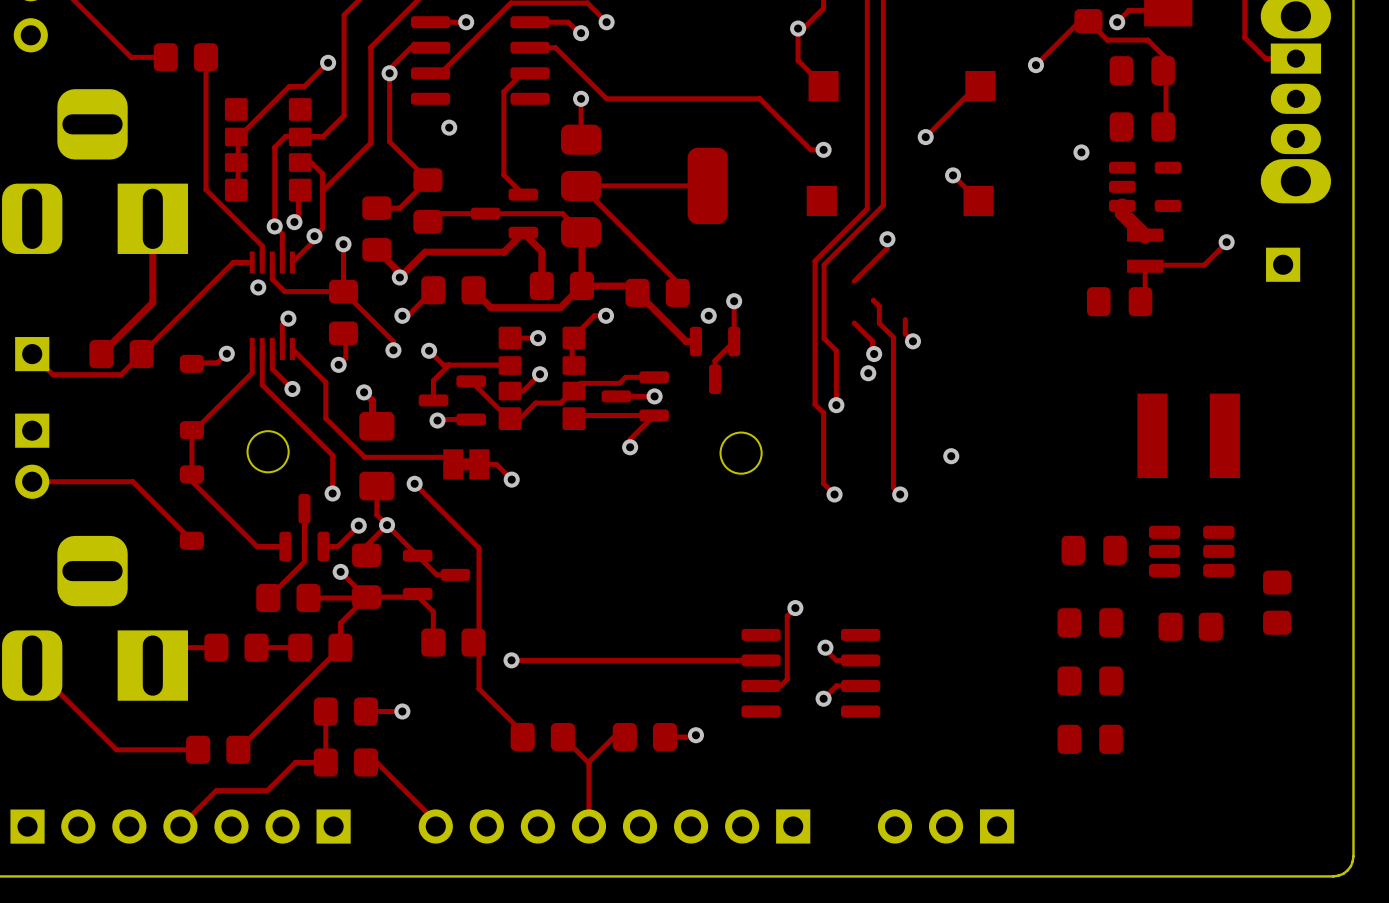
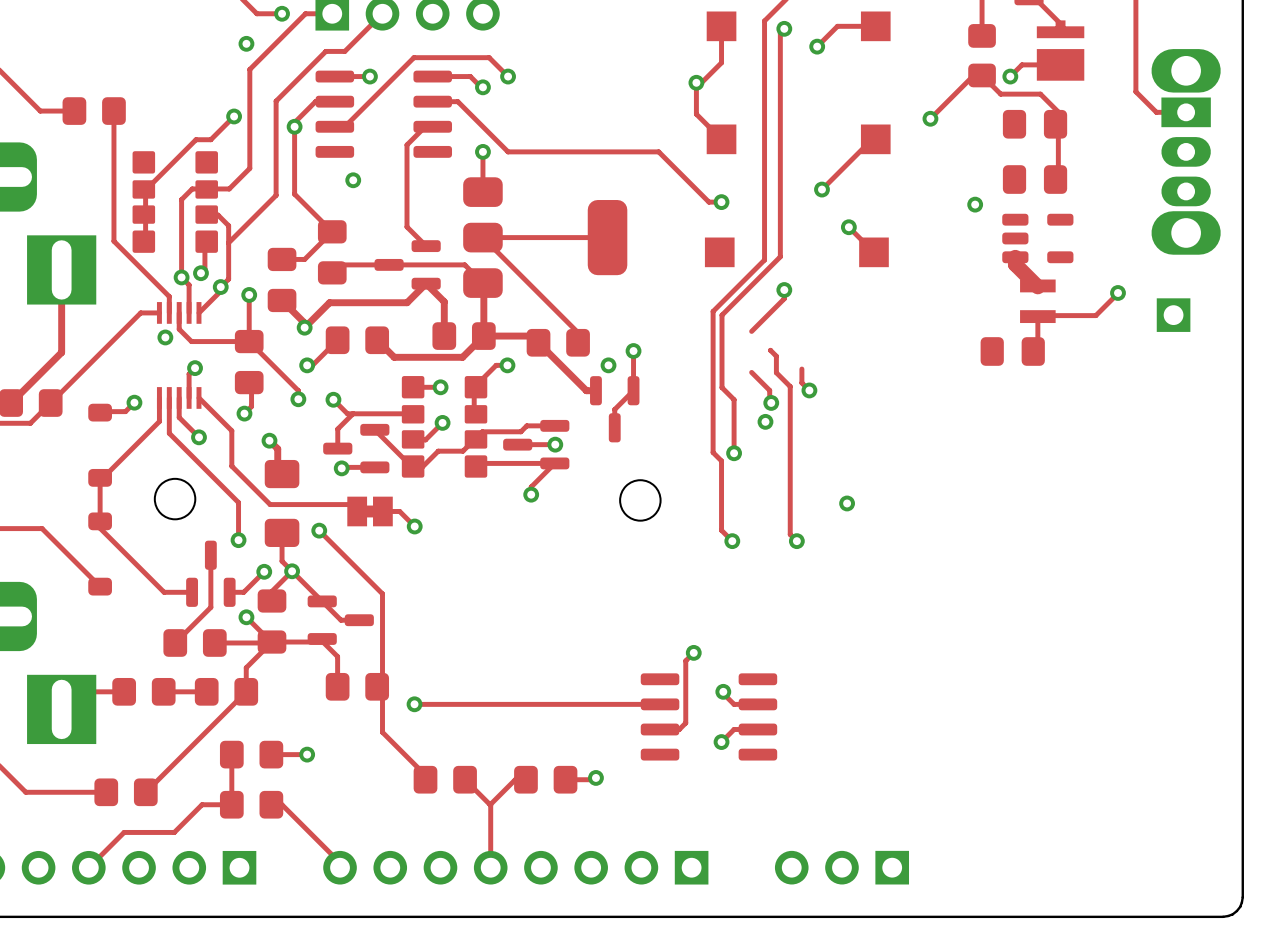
part: (1188, 435) -> none
part: (1094, 550) -> none
part: (1191, 551) -> none
part: (1277, 602) -> none
part: (1090, 622) -> none
part: (1190, 626) -> none
part: (1090, 681) -> none
part: (1090, 739) -> none

